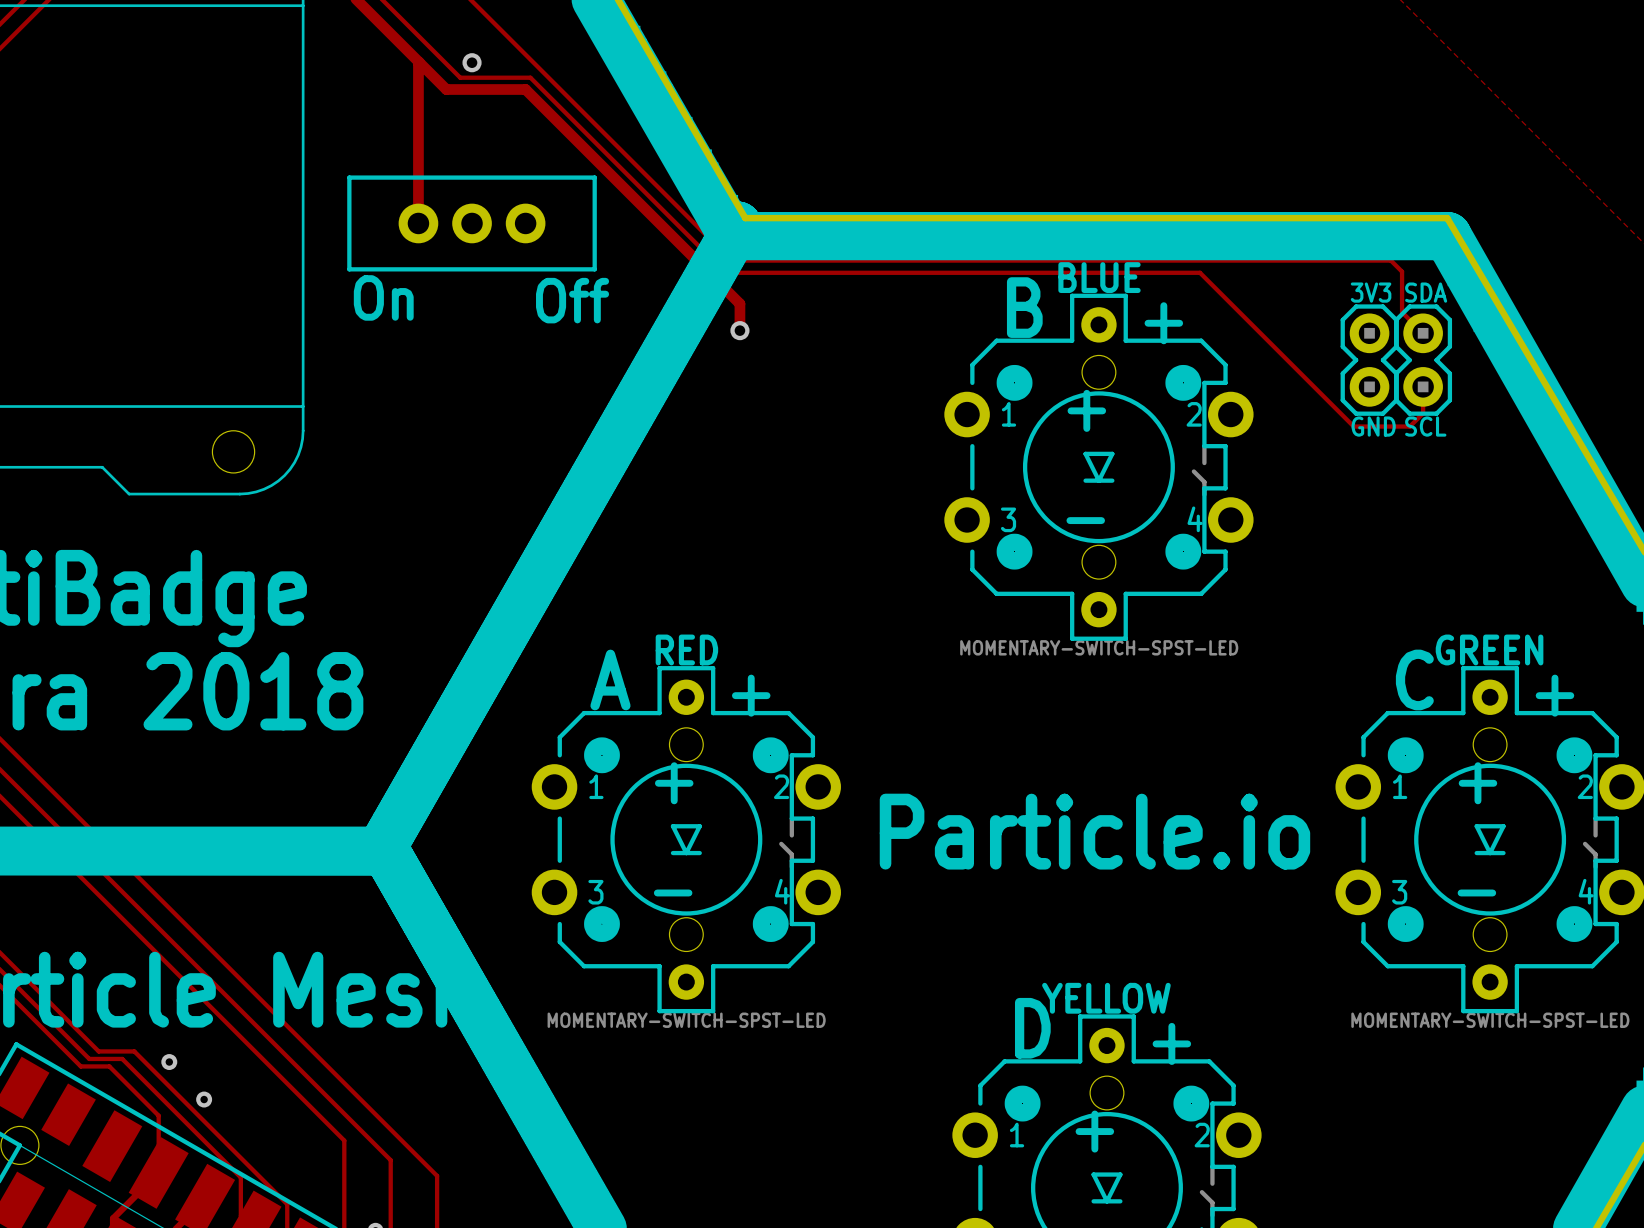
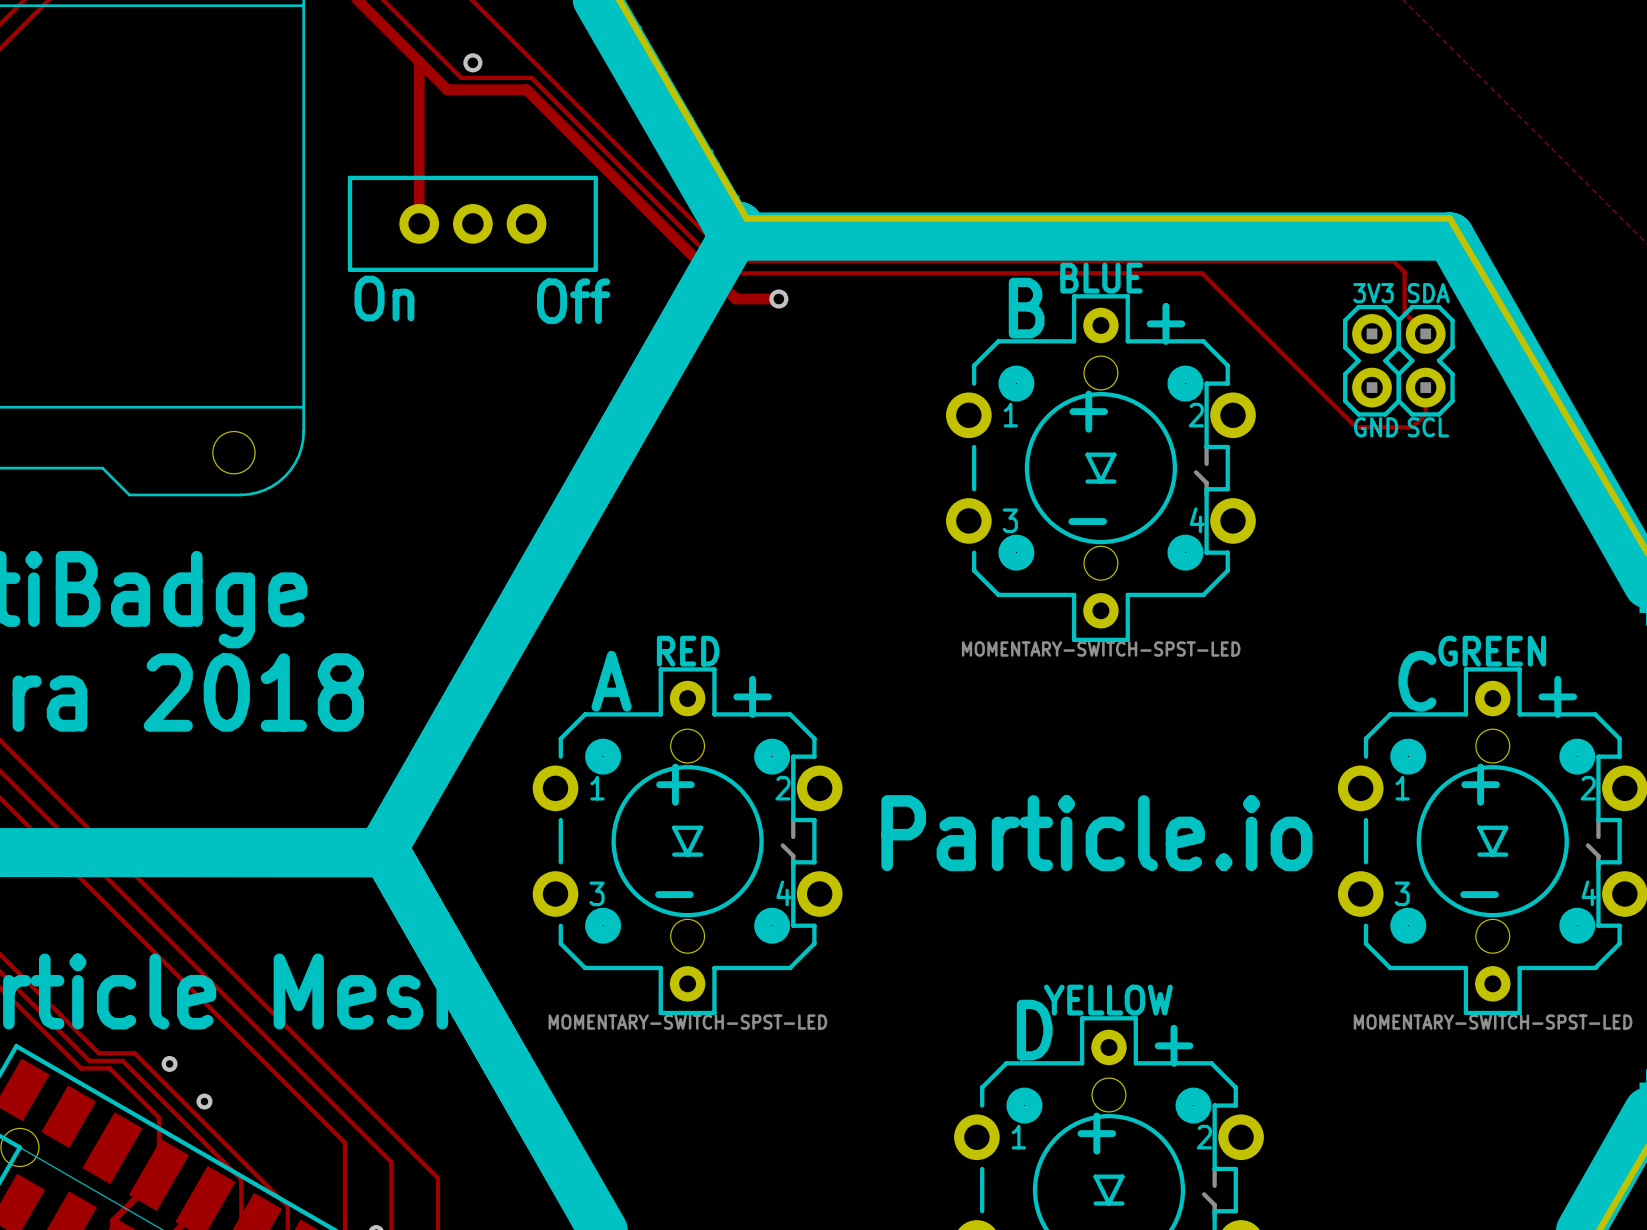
track: (734, 298) (739, 303) (739, 330) -> (735, 299) (778, 299)
via position: (739, 330) -> (778, 299)

